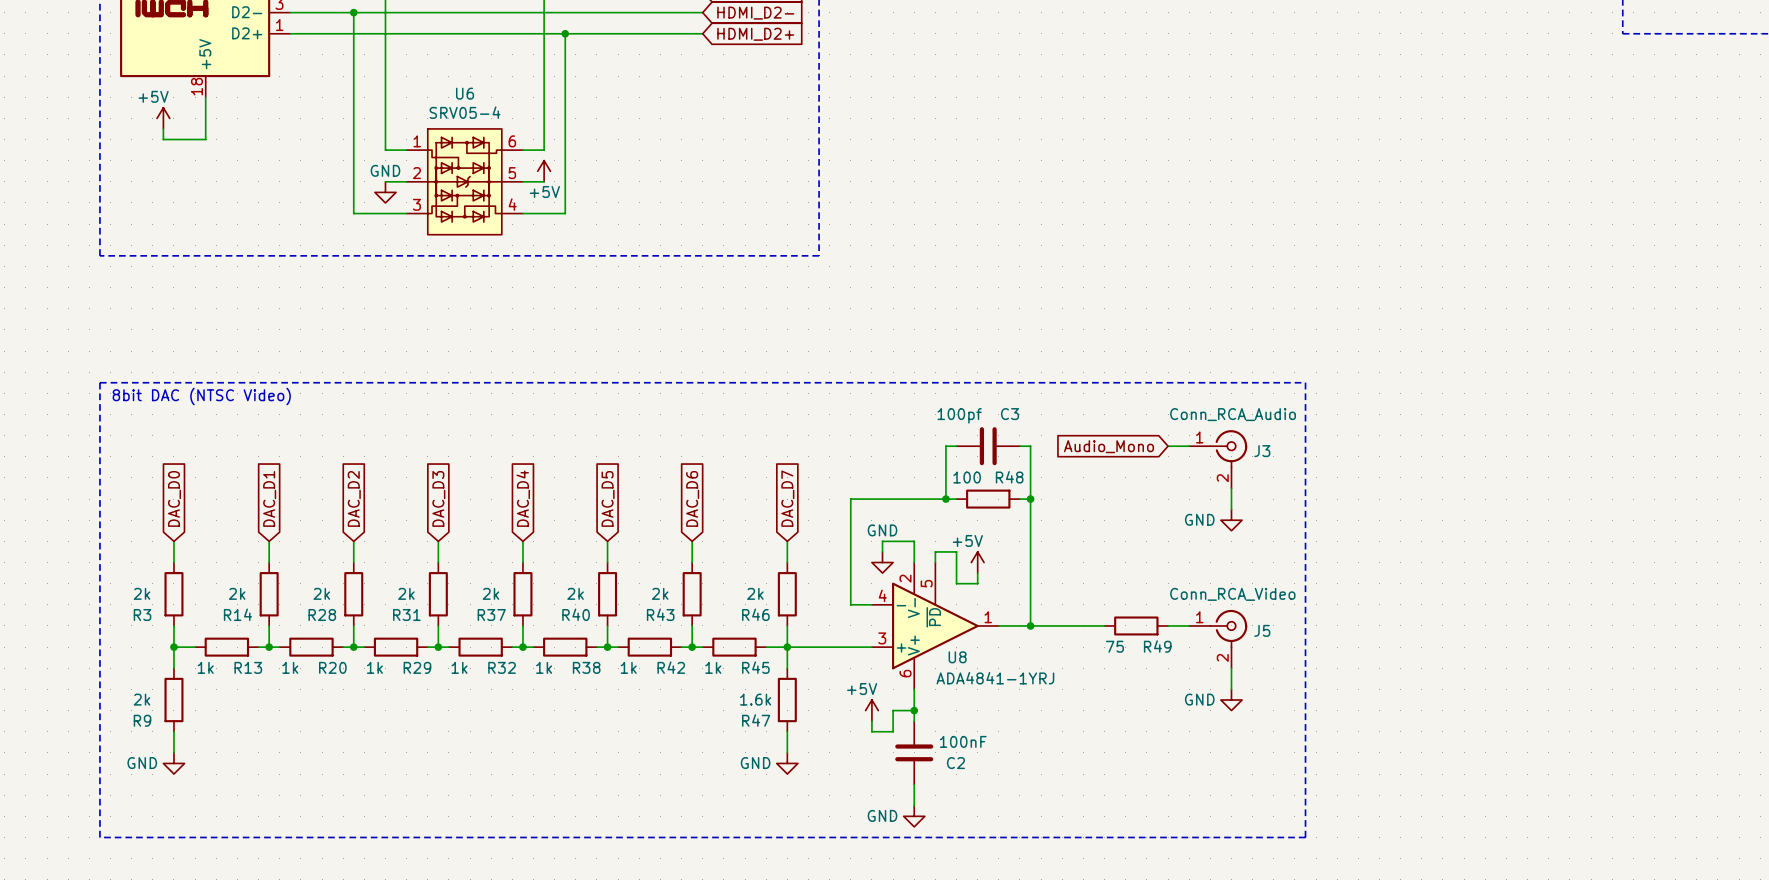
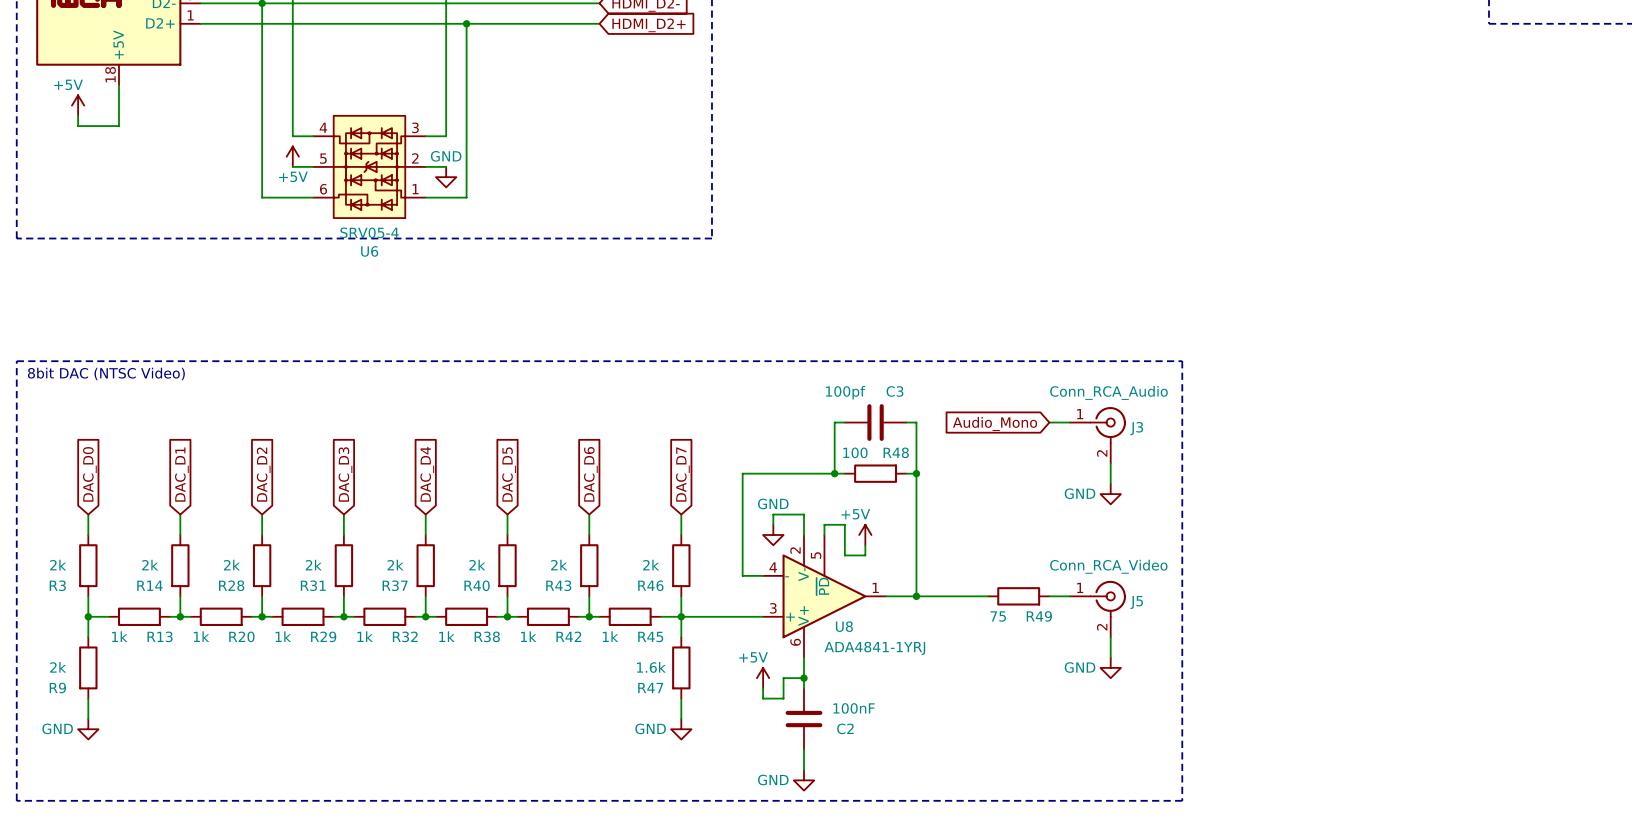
power symbol position: +5V (544, 171) -> +5V (292, 156)
U6 rotation: 0° (464, 181) -> 180° (369, 166)
power symbol position: GND (385, 192) -> GND (446, 177)

